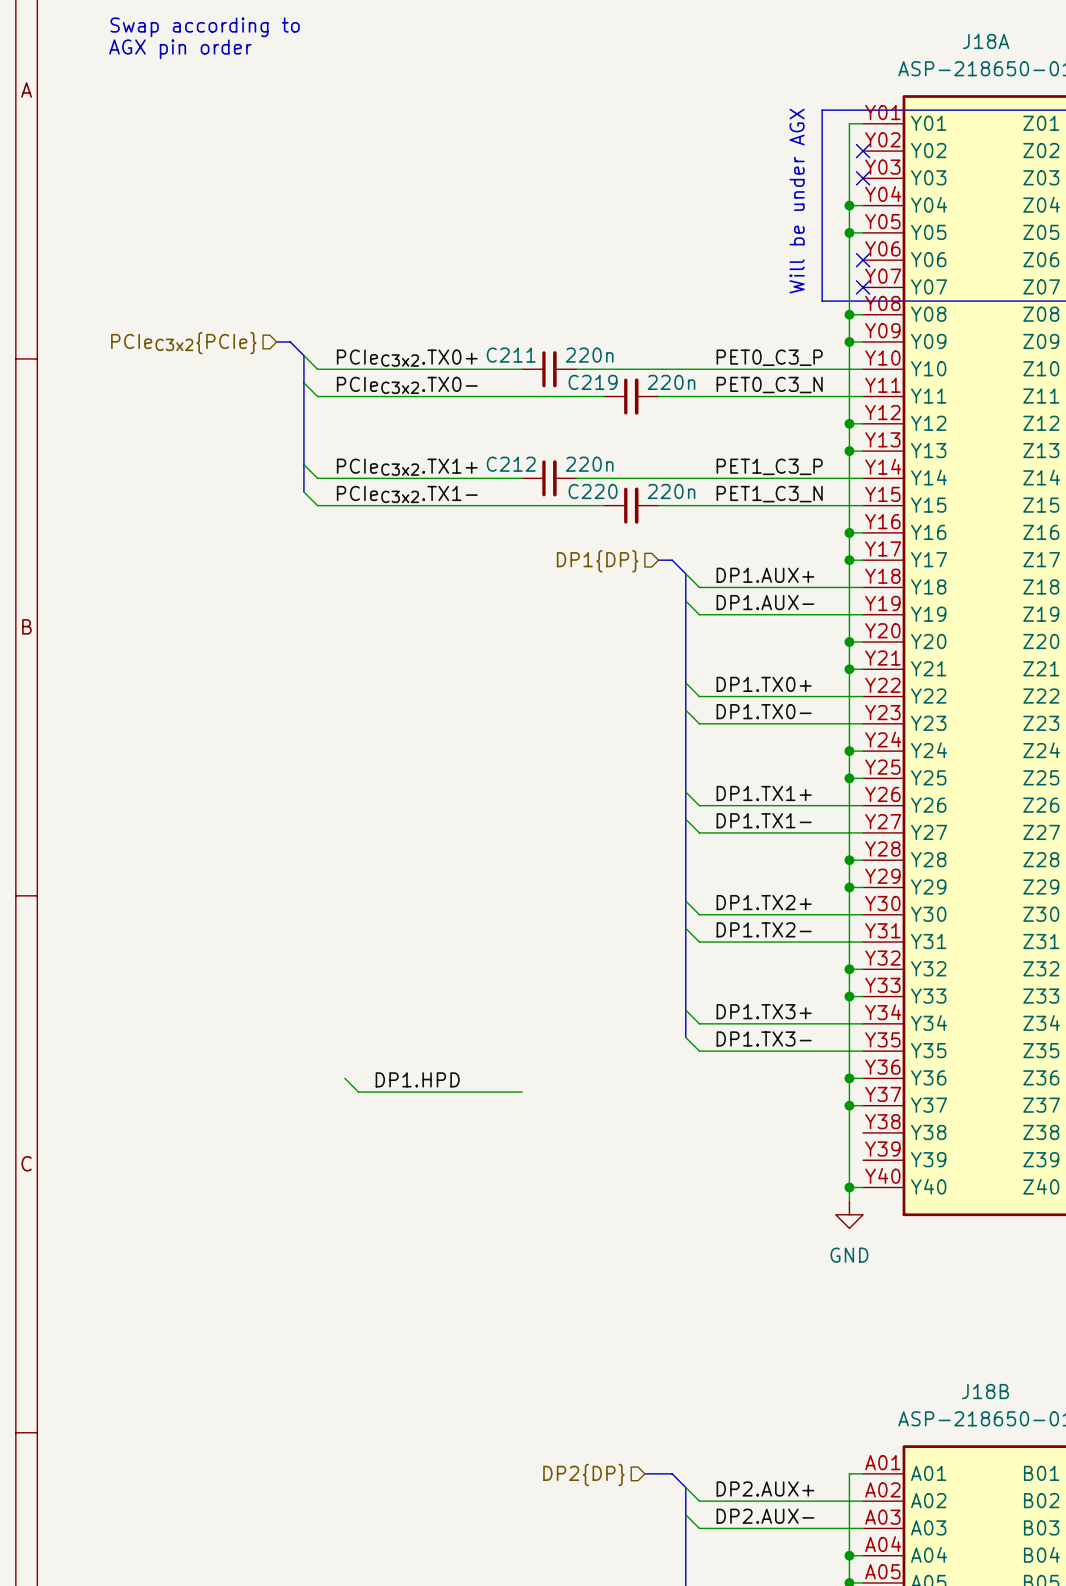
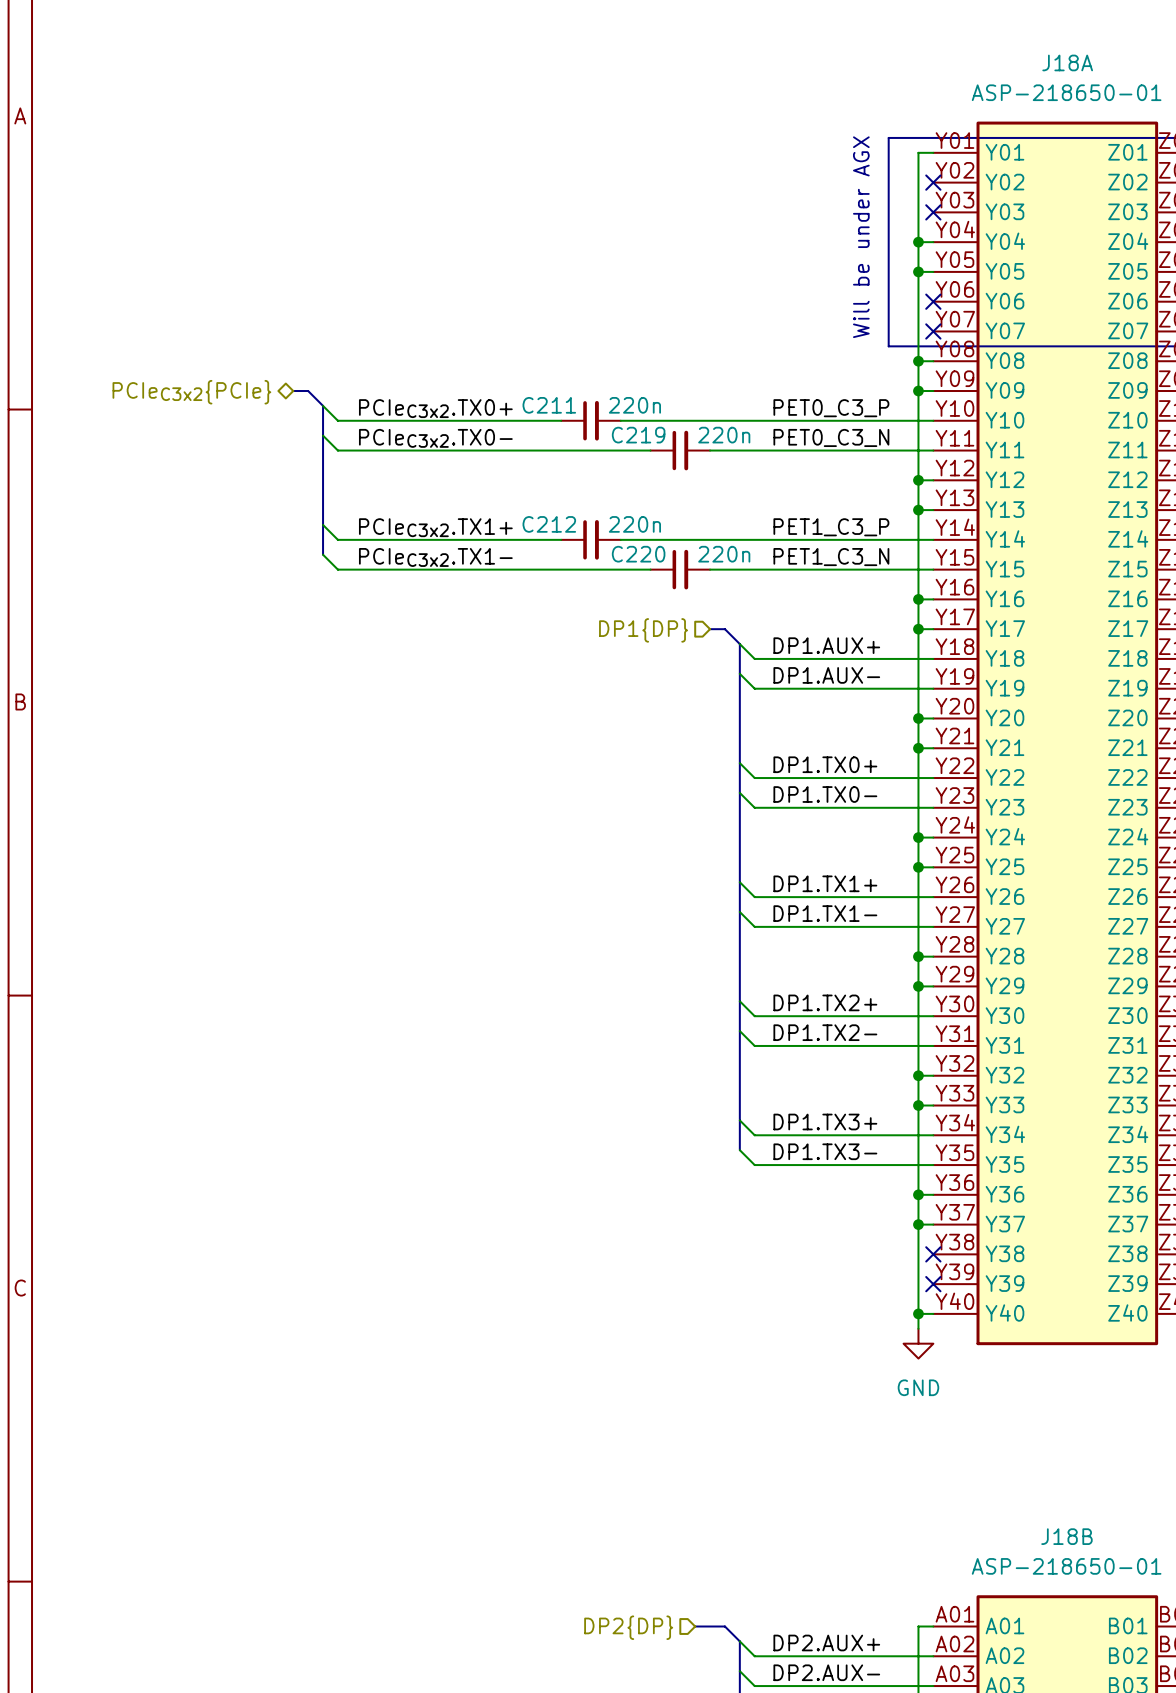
text: Swap according to (205, 27) -> none
text: AGX pin order (180, 49) -> none
hierarchical label shape: input (183, 343) -> bidirectional (191, 392)
wire: (344, 1078) (358, 1092) (522, 1092) -> none
label: DP1.HPD (417, 1079) -> none
no-connect mark: none -> (933, 1254)
no-connect mark: none -> (933, 1284)

